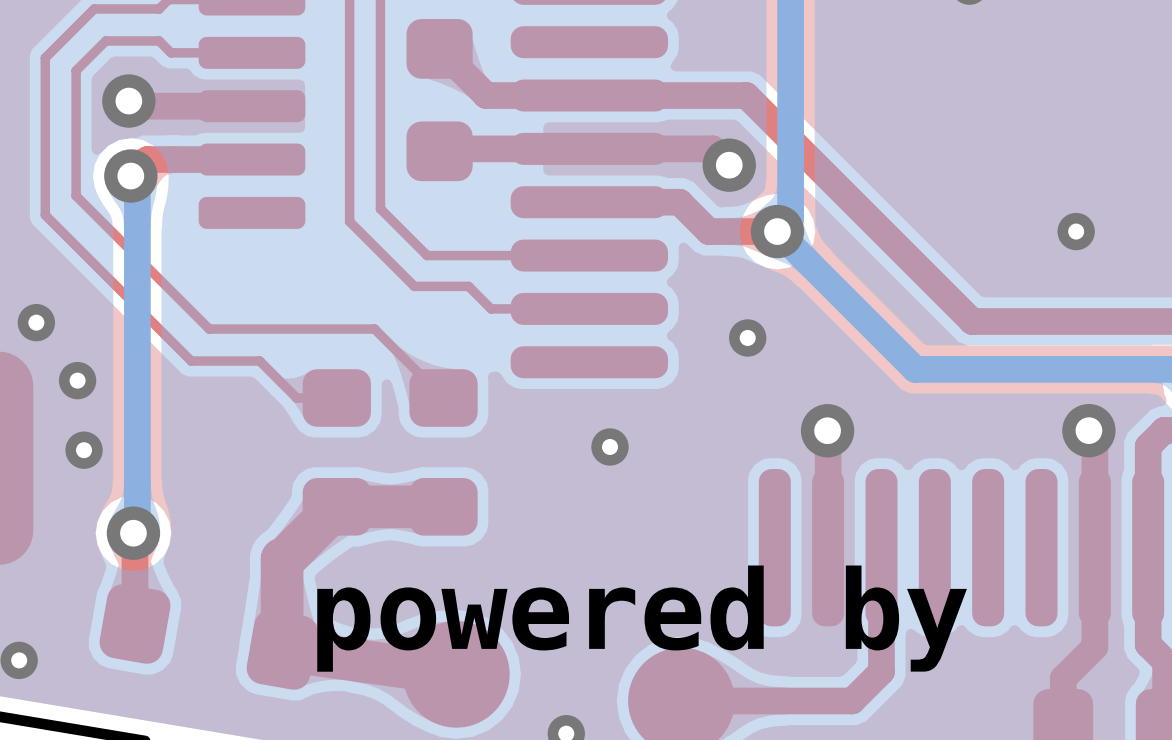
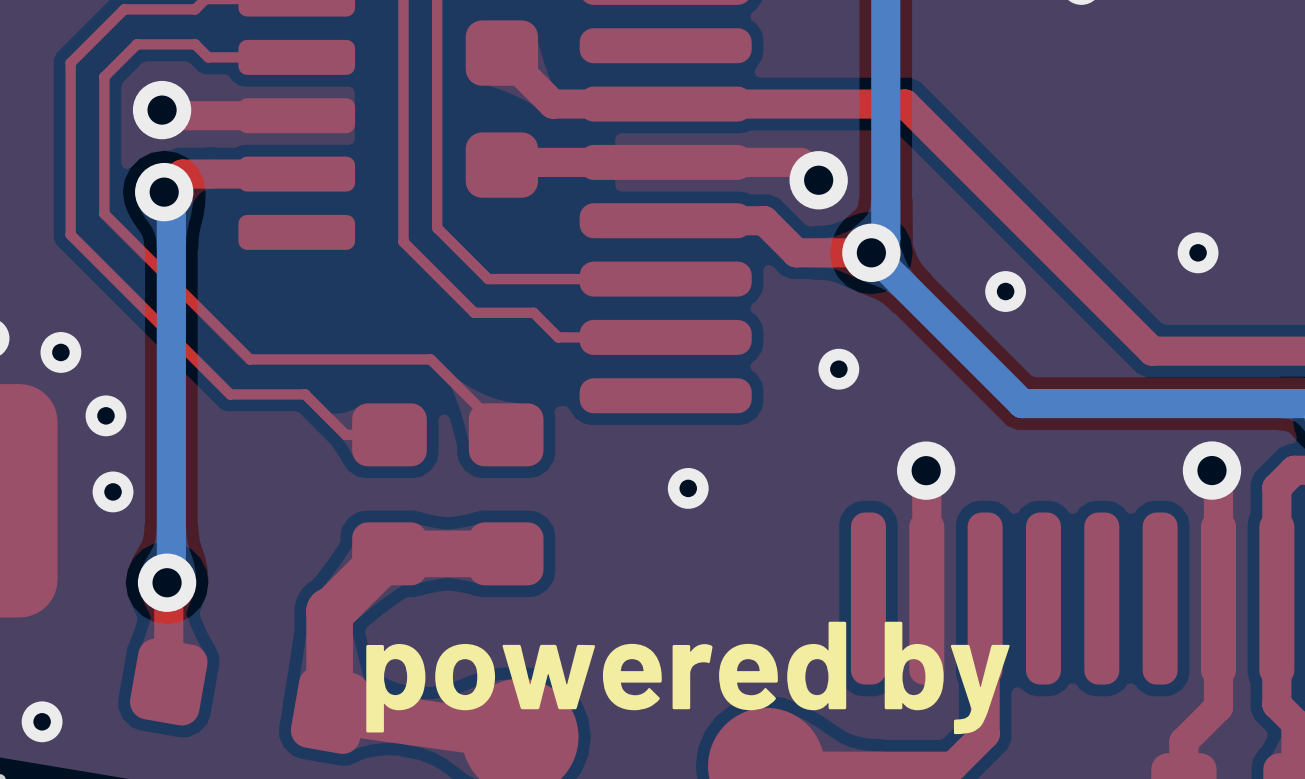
top track: (746, 95) (972, 321) (1034, 321) -> (837, 104) (905, 104) (1152, 351)
via: none -> (1005, 291)

